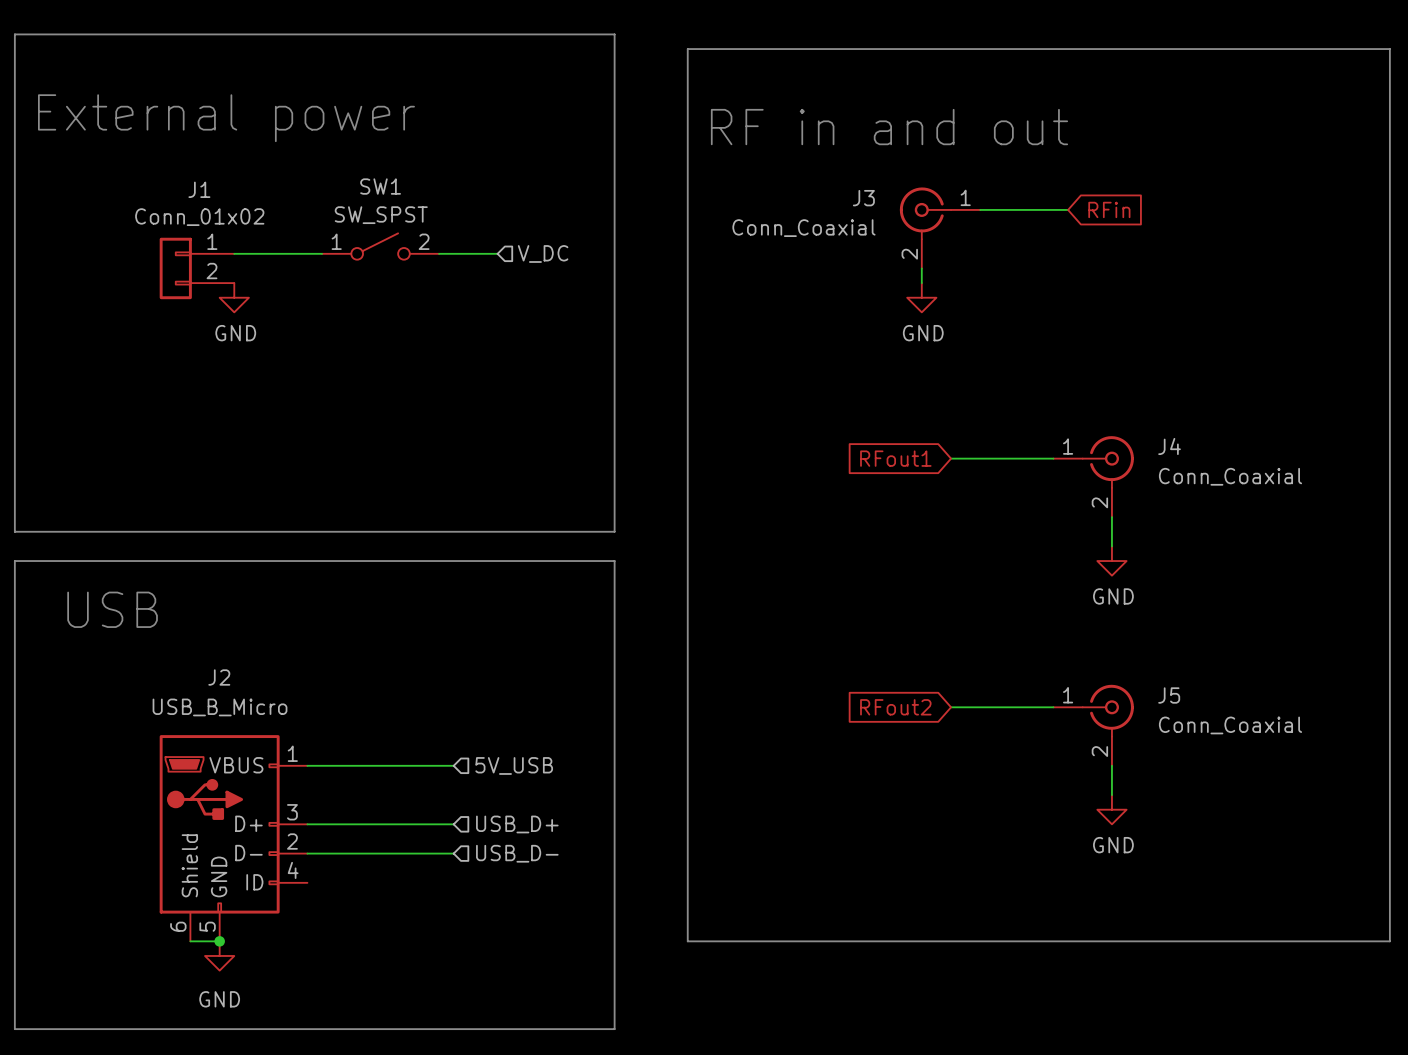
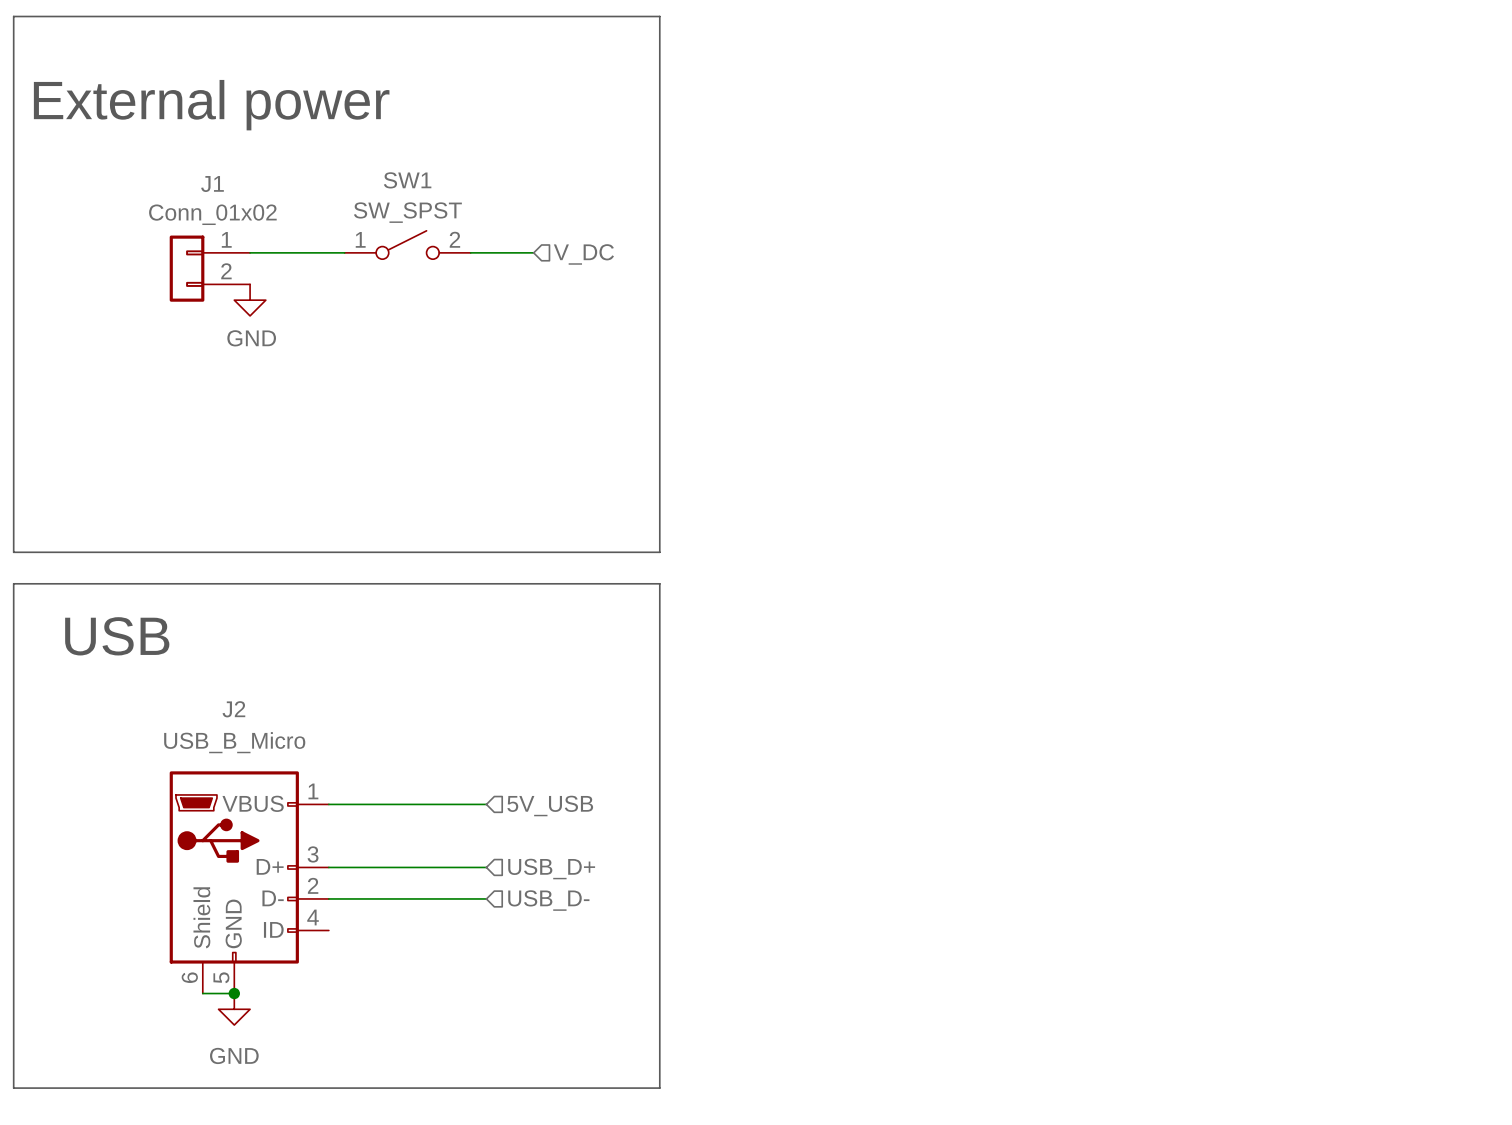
line: (687, 49) (1389, 49) (1389, 941) (687, 941) (687, 49) -> none
text: RF in and out (889, 127) -> none
wire: (980, 209) (1068, 209) -> none
global label: RFin (1109, 209) -> none
J3: Conn_Coaxial (940, 227) -> none
wire: (921, 268) (921, 283) -> none
power symbol: GND (921, 297) -> none
global label: RFout1 (895, 458) -> none
wire: (951, 458) (1053, 458) -> none
J4: Conn_Coaxial (1093, 476) -> none
wire: (1111, 517) (1111, 546) -> none
power symbol: GND (1111, 561) -> none
global label: RFout2 (895, 707) -> none
wire: (951, 707) (1053, 707) -> none
J5: Conn_Coaxial (1093, 725) -> none
wire: (1111, 765) (1111, 795) -> none
power symbol: GND (1111, 809) -> none

